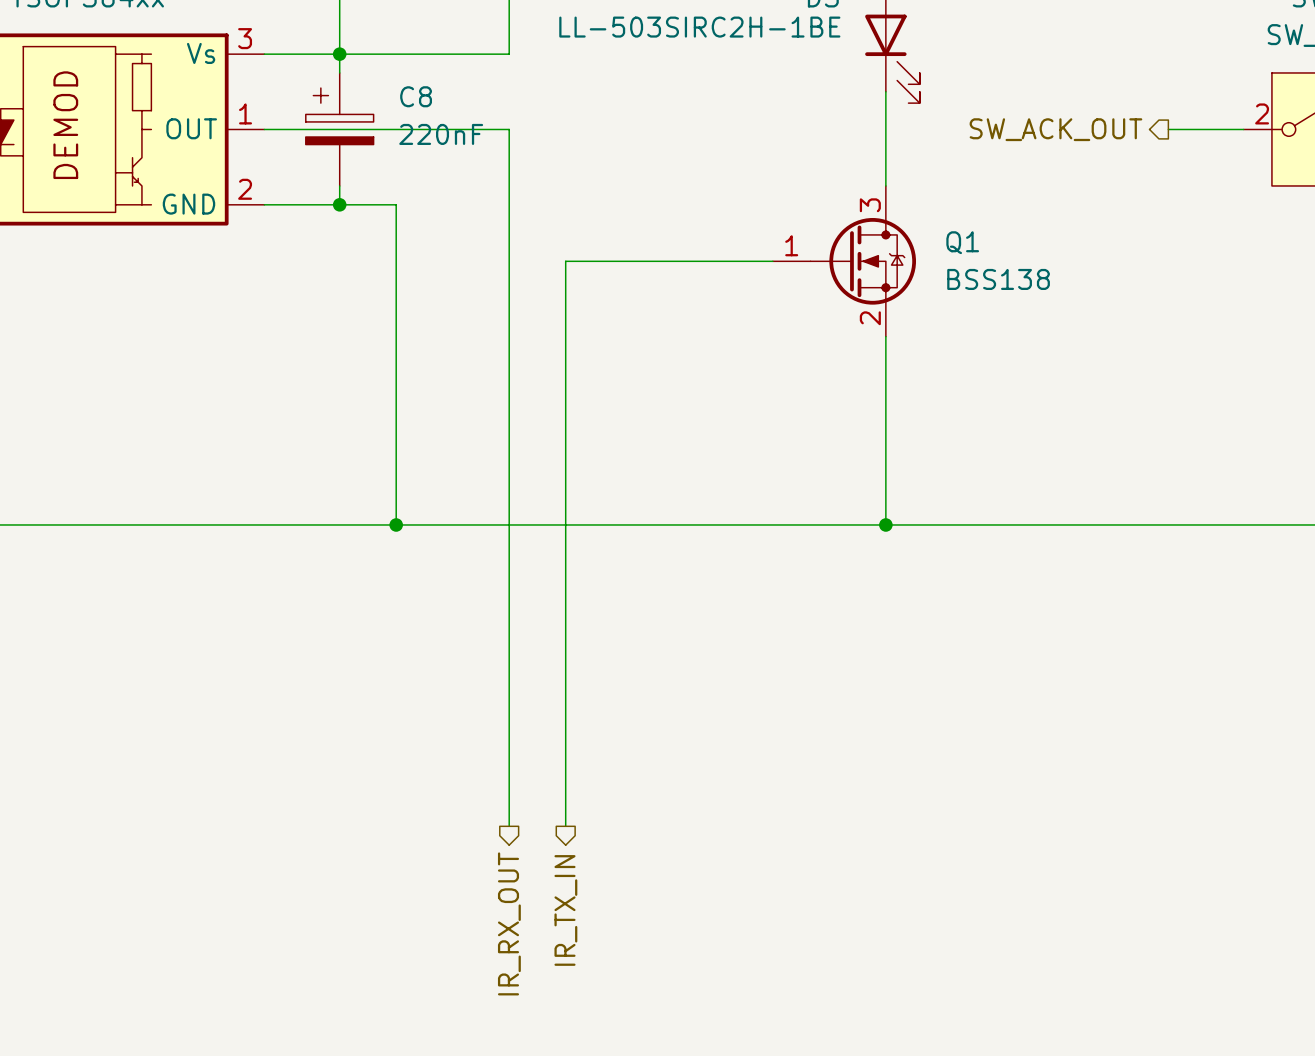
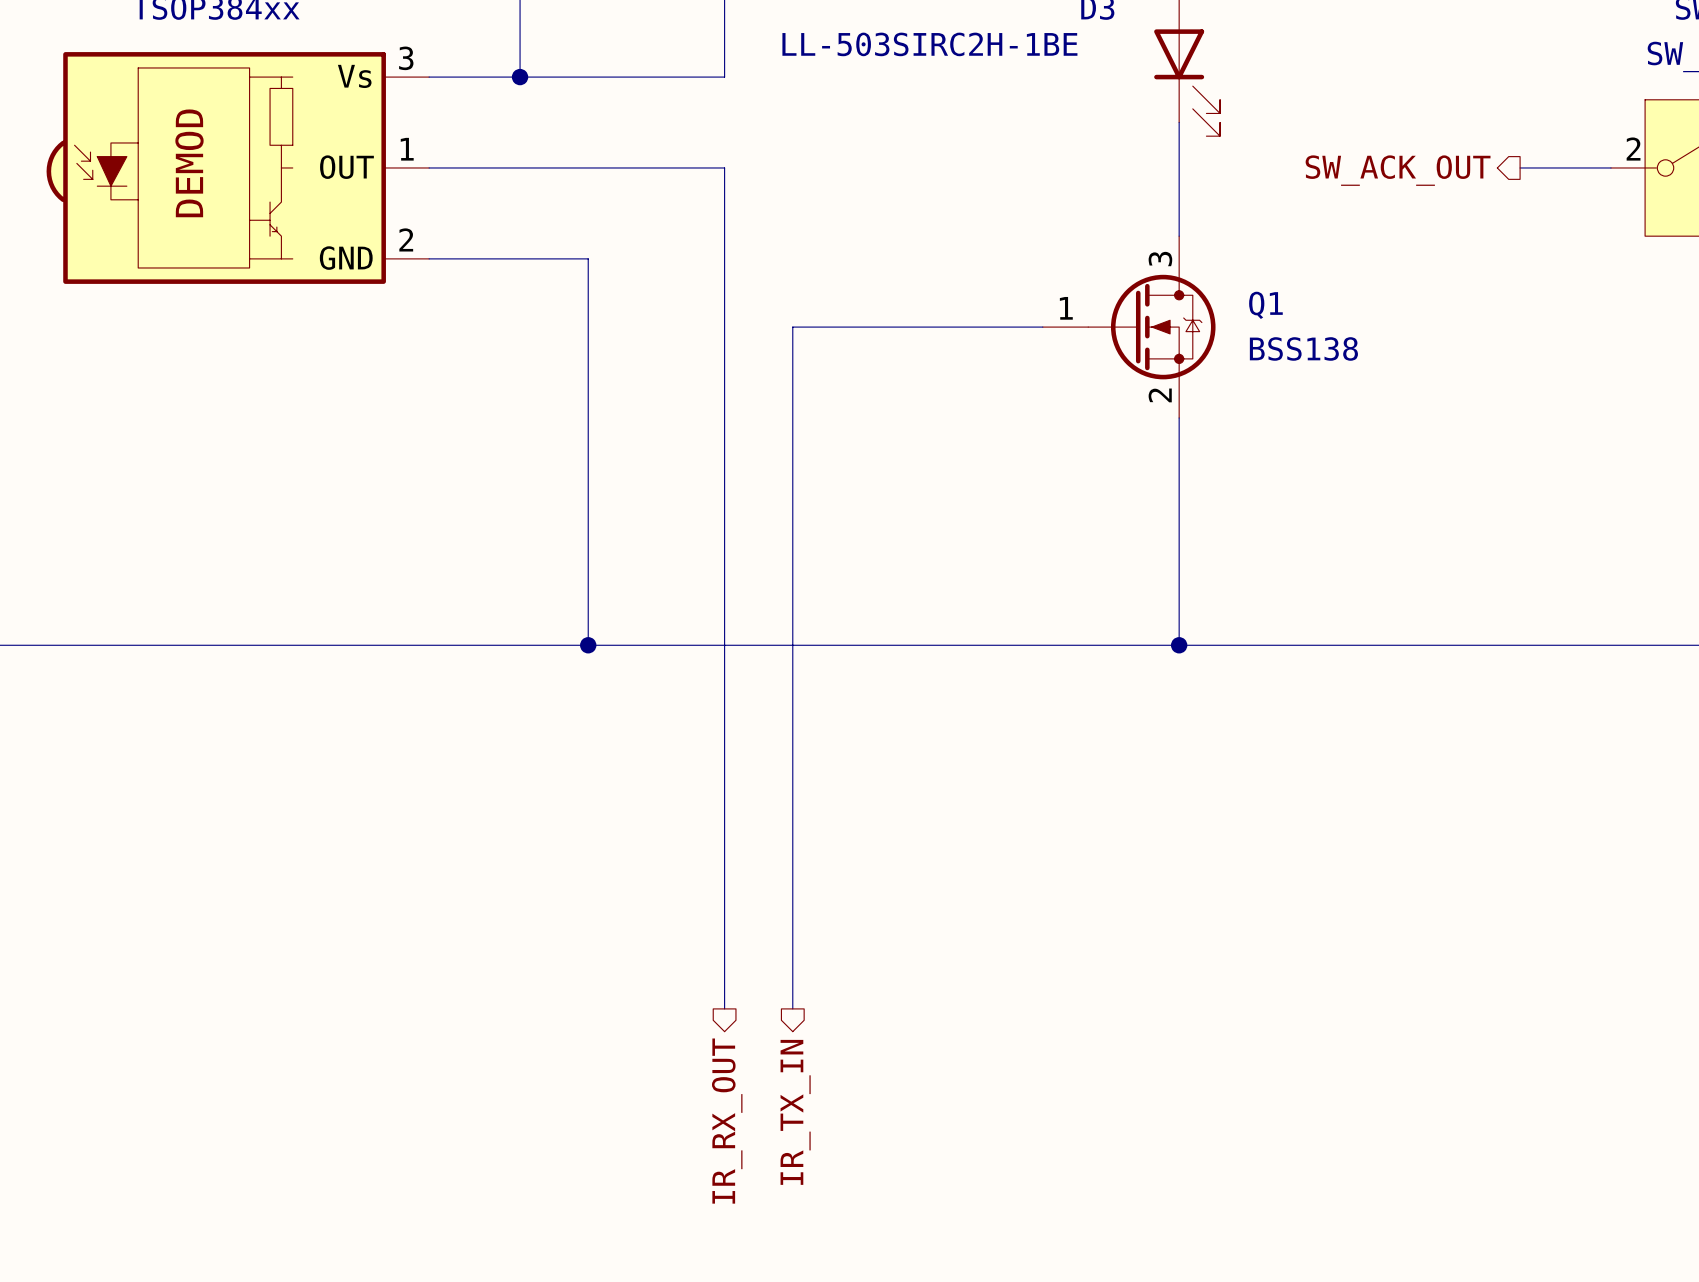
wire: (339, 54) (339, 72) -> none
C8: 220nF (339, 129) -> none
wire: (339, 185) (339, 204) -> none
junction: (339, 204) -> none

